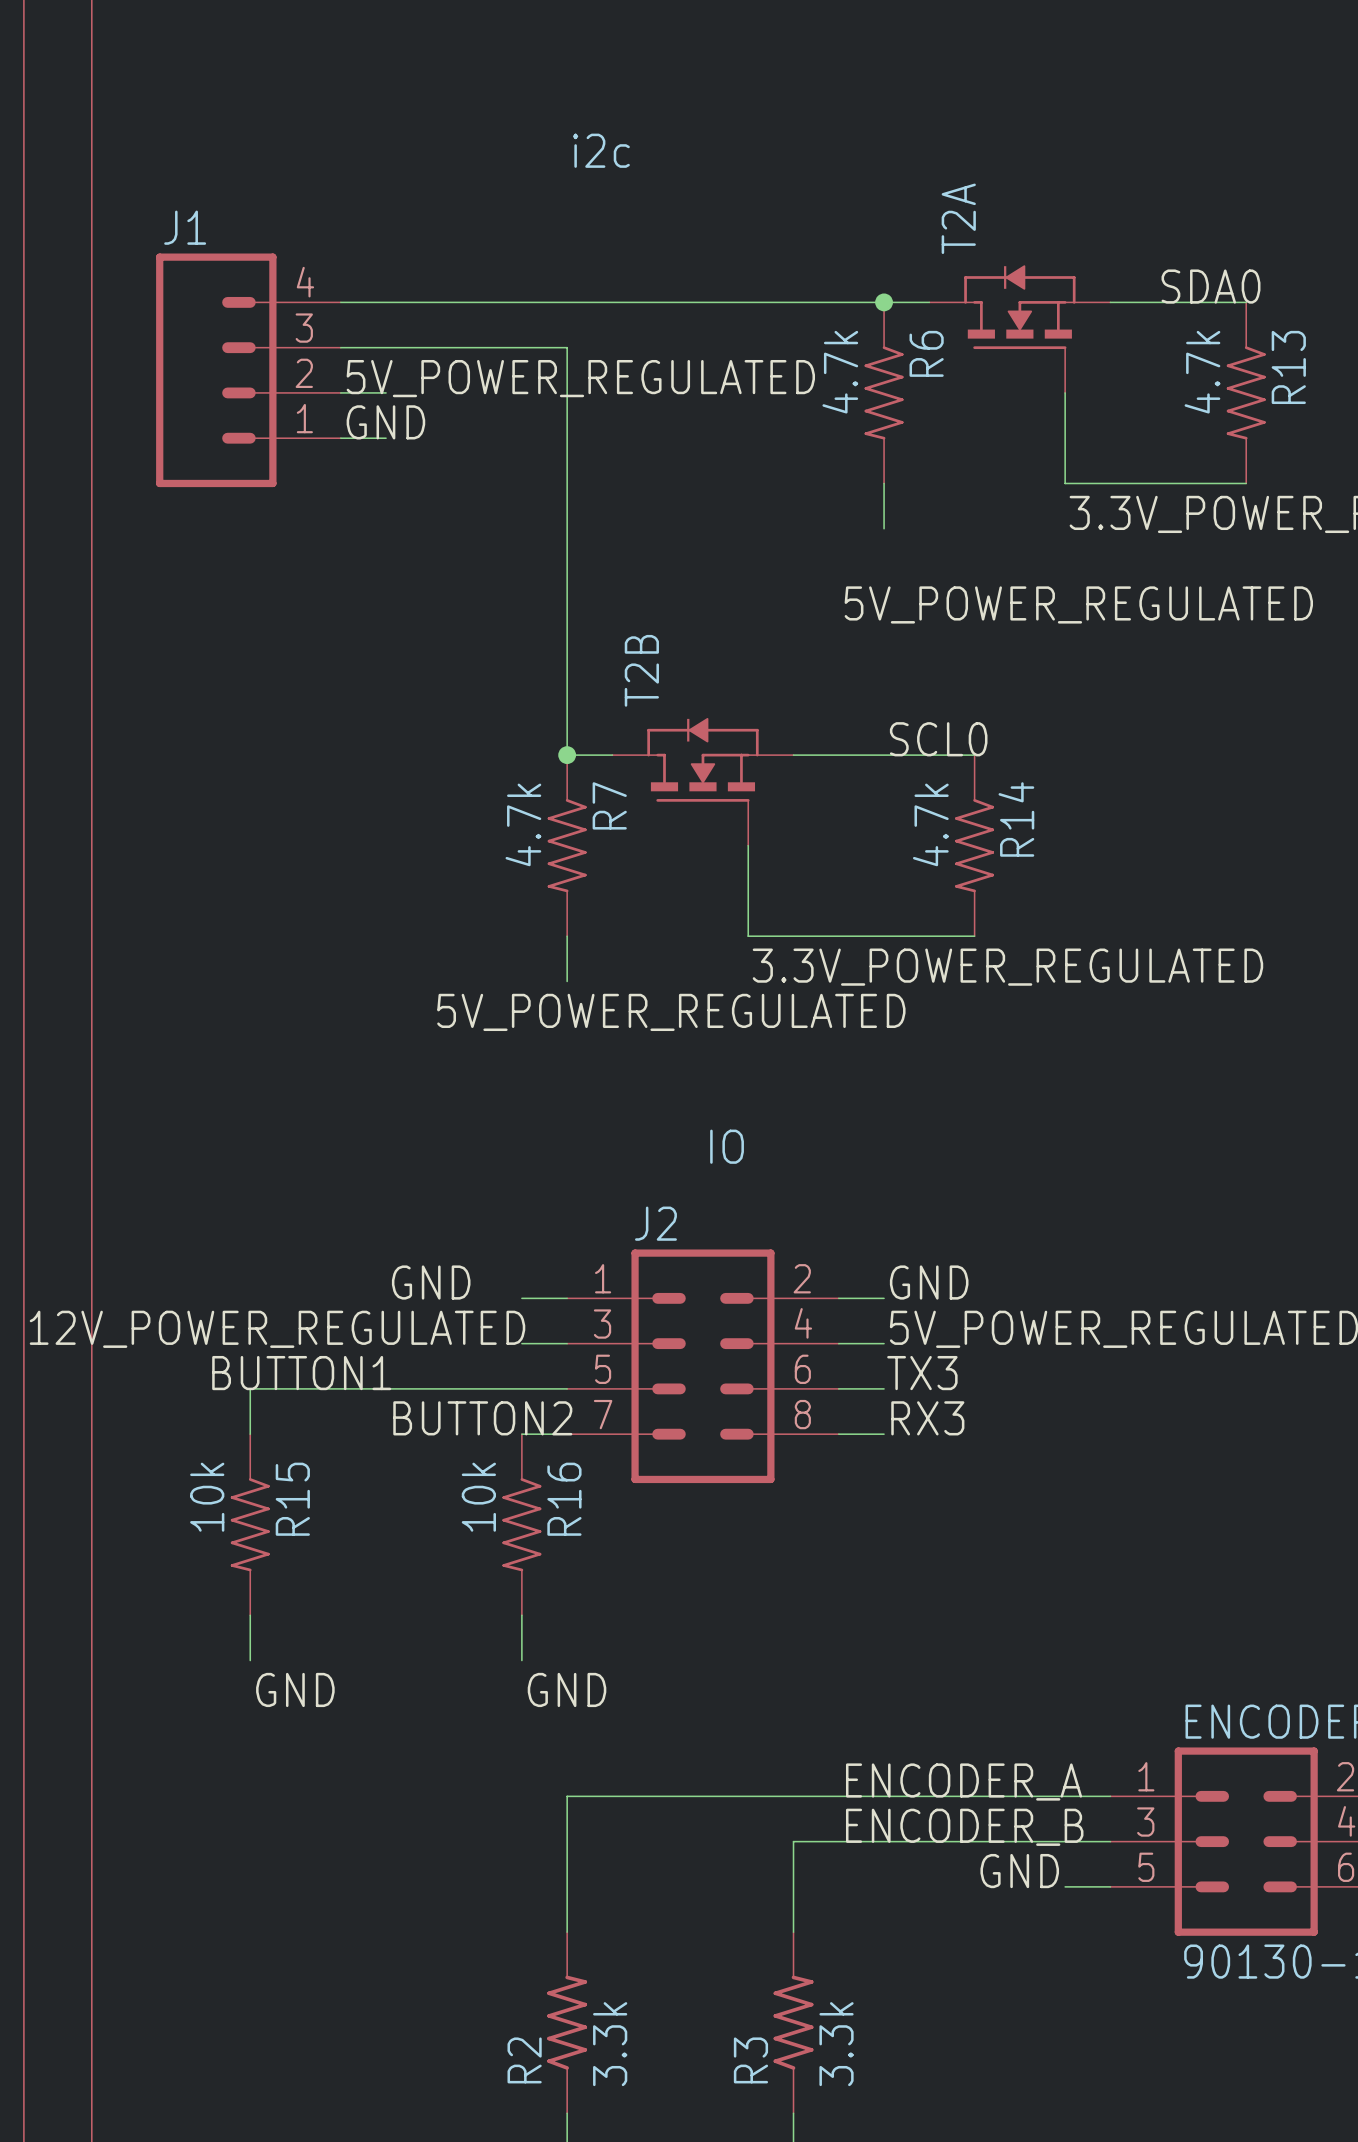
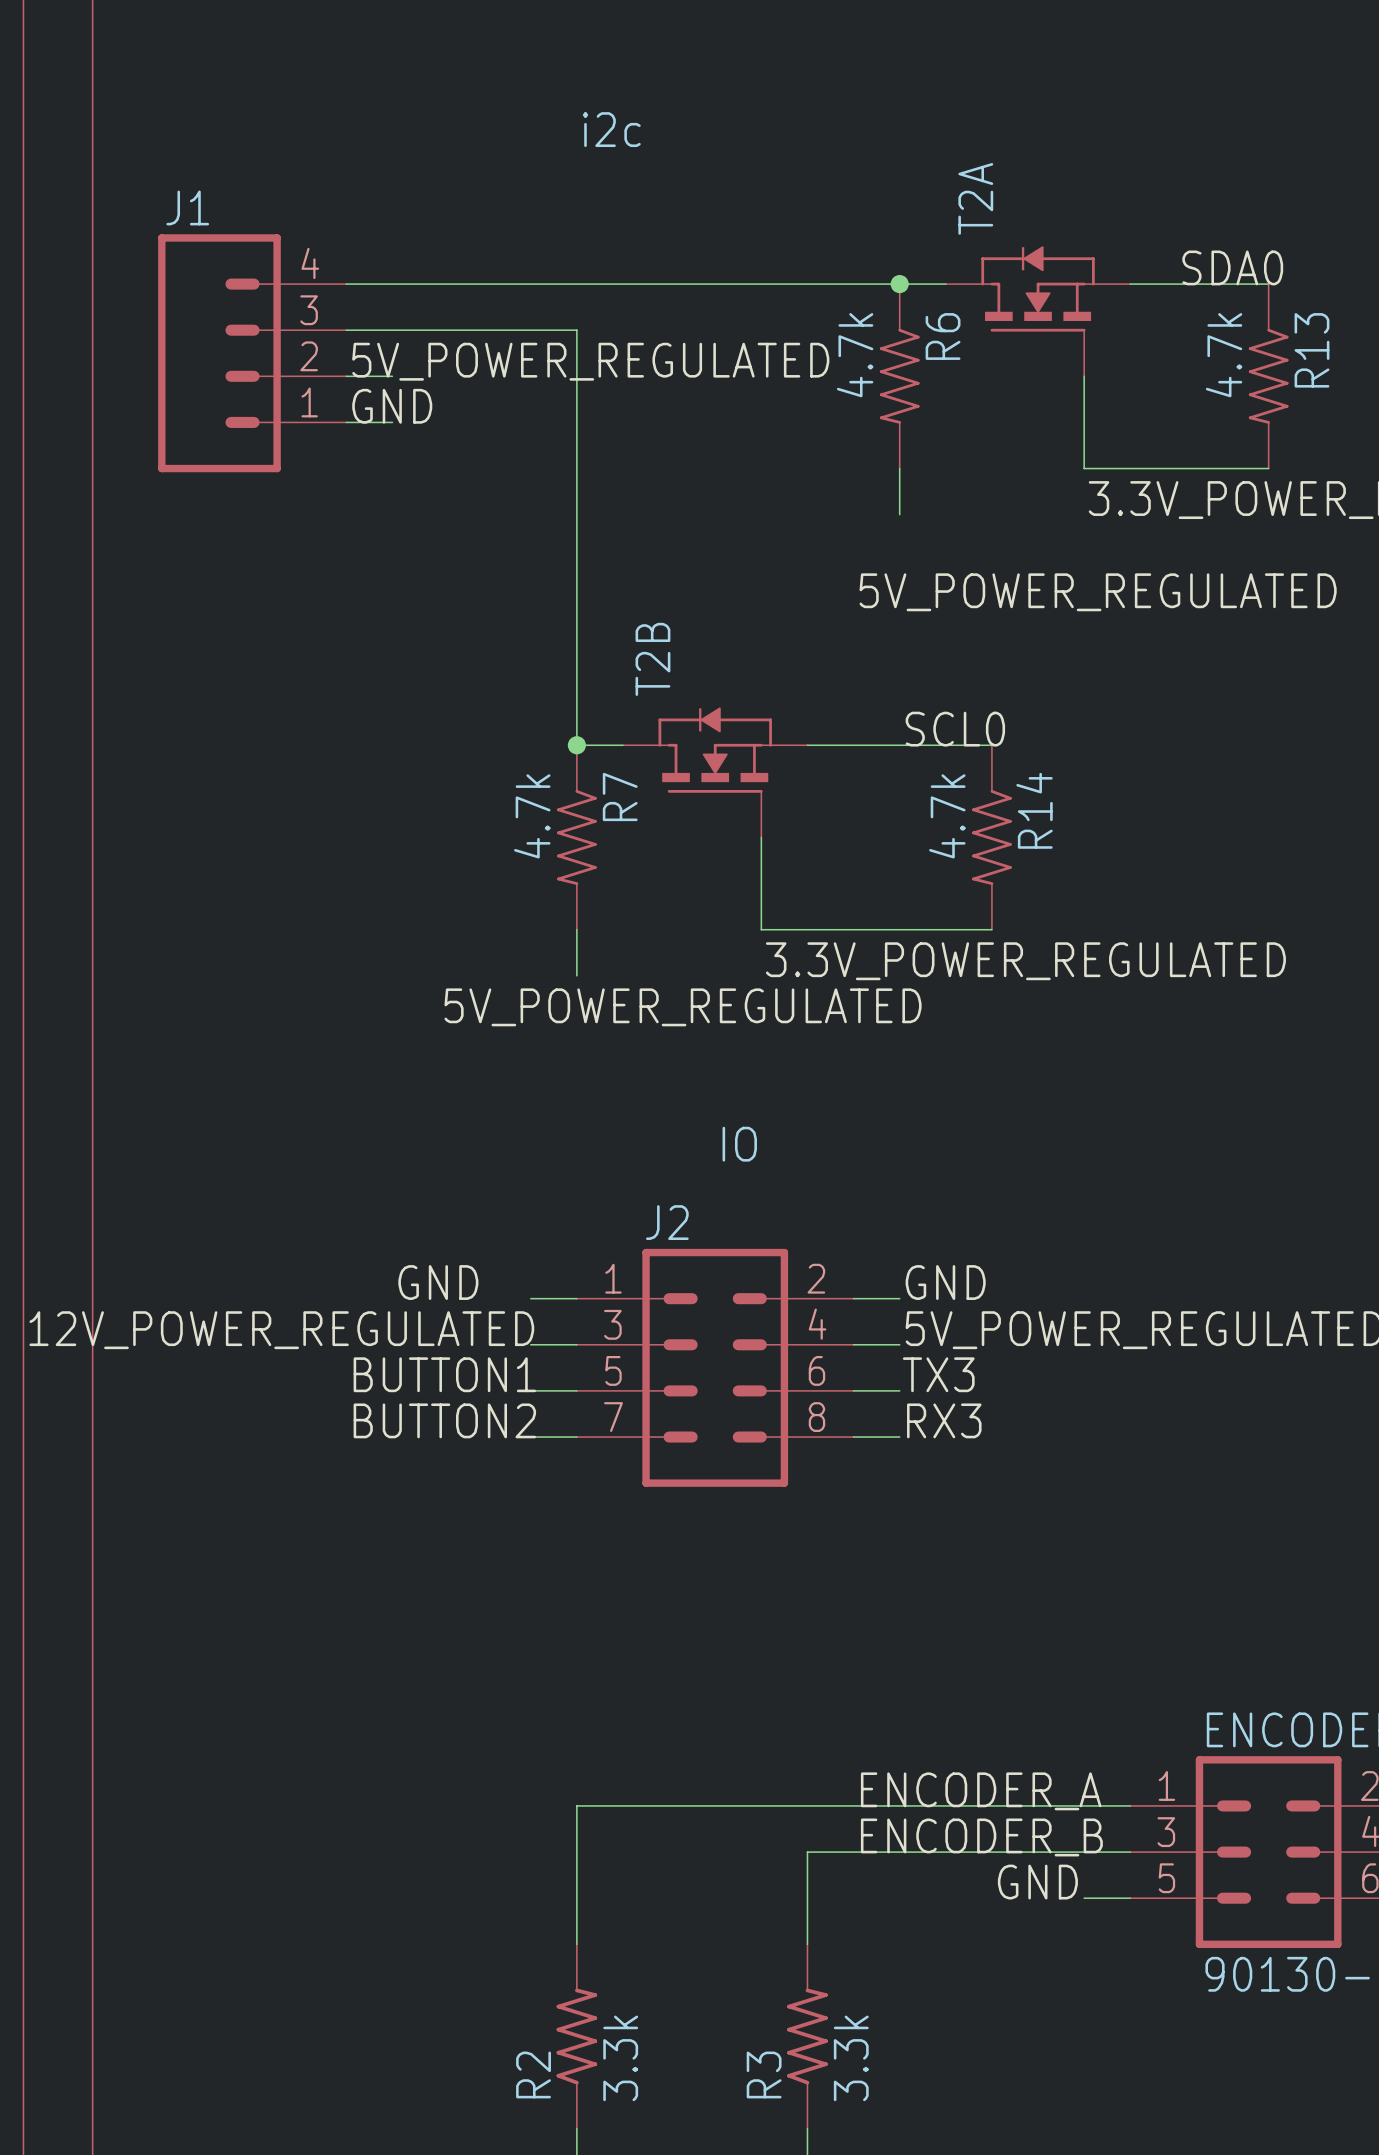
label position: BUTTON1 (301, 1373) -> BUTTON1 (444, 1374)
wire: (521, 1388) (250, 1388) (250, 1434) -> none
label position: BUTTON2 (482, 1418) -> BUTTON2 (444, 1420)
R15: 10k (250, 1524) -> none
R16: 10k (521, 1524) -> none
wire: (250, 1615) (250, 1660) -> none
wire: (521, 1615) (521, 1660) -> none
label: GND (295, 1689) -> none
label: GND (567, 1689) -> none

